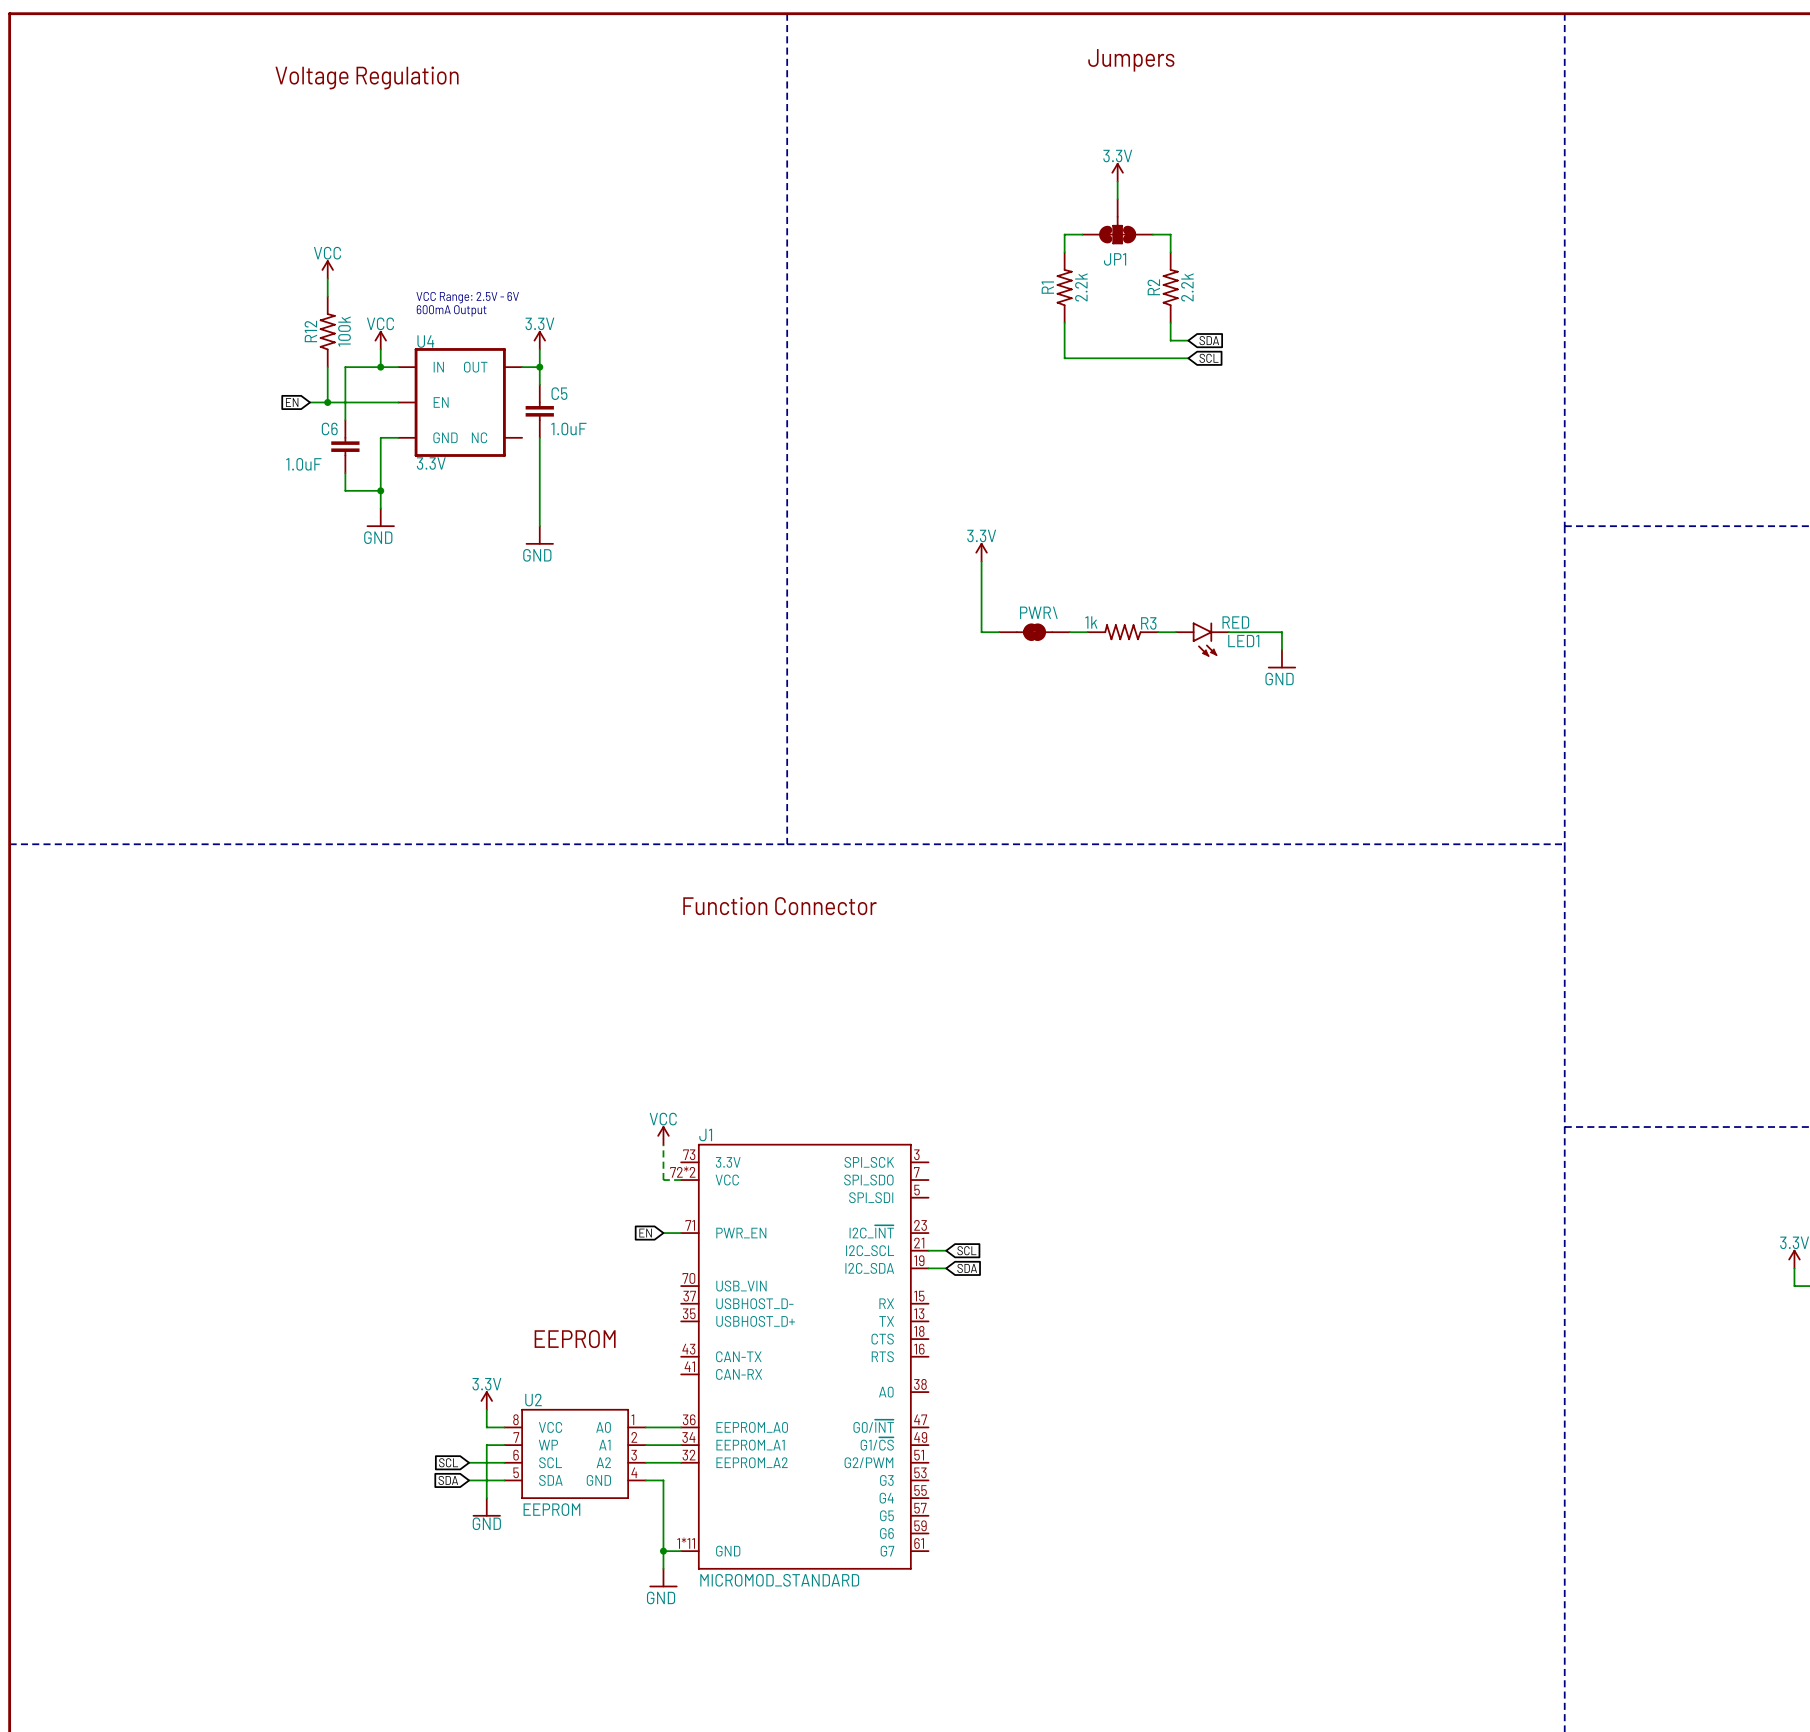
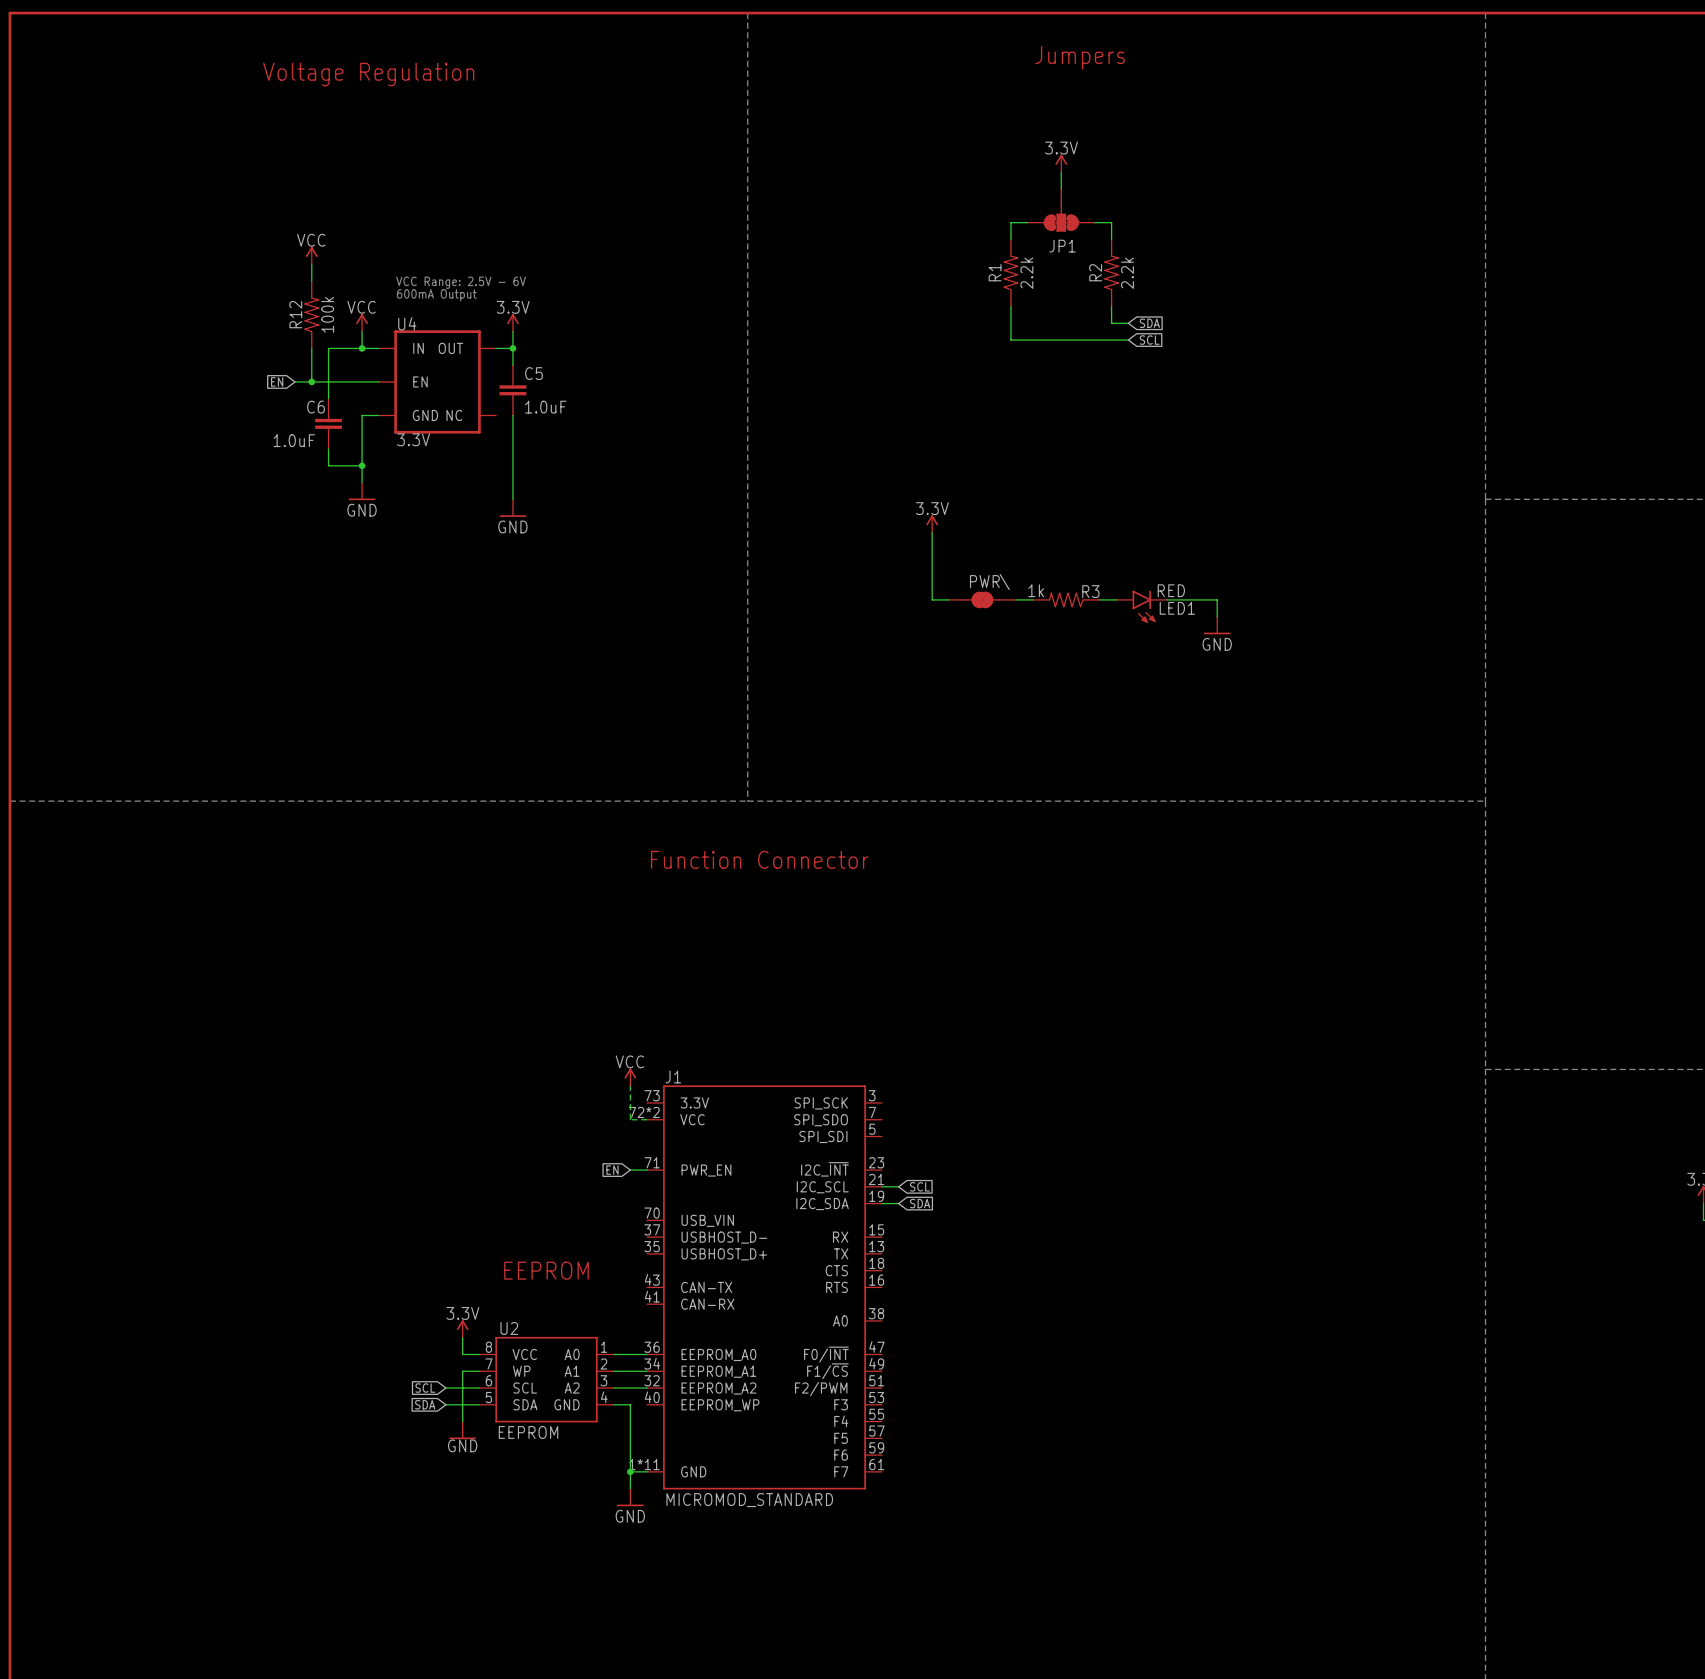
J1 symbol: [681, 1143, 929, 1570] -> [647, 1085, 882, 1490]

